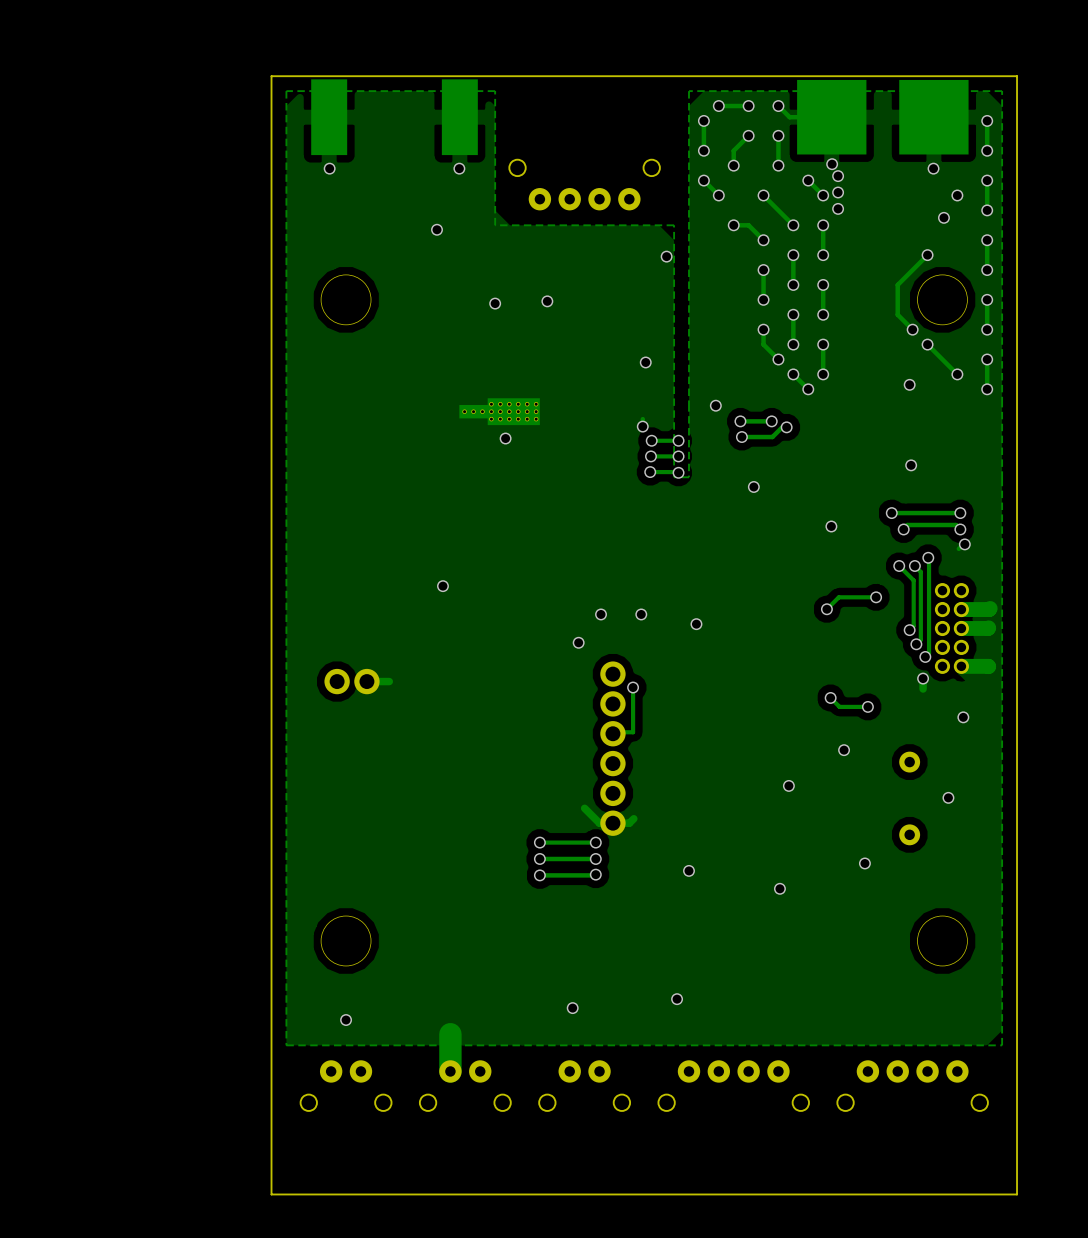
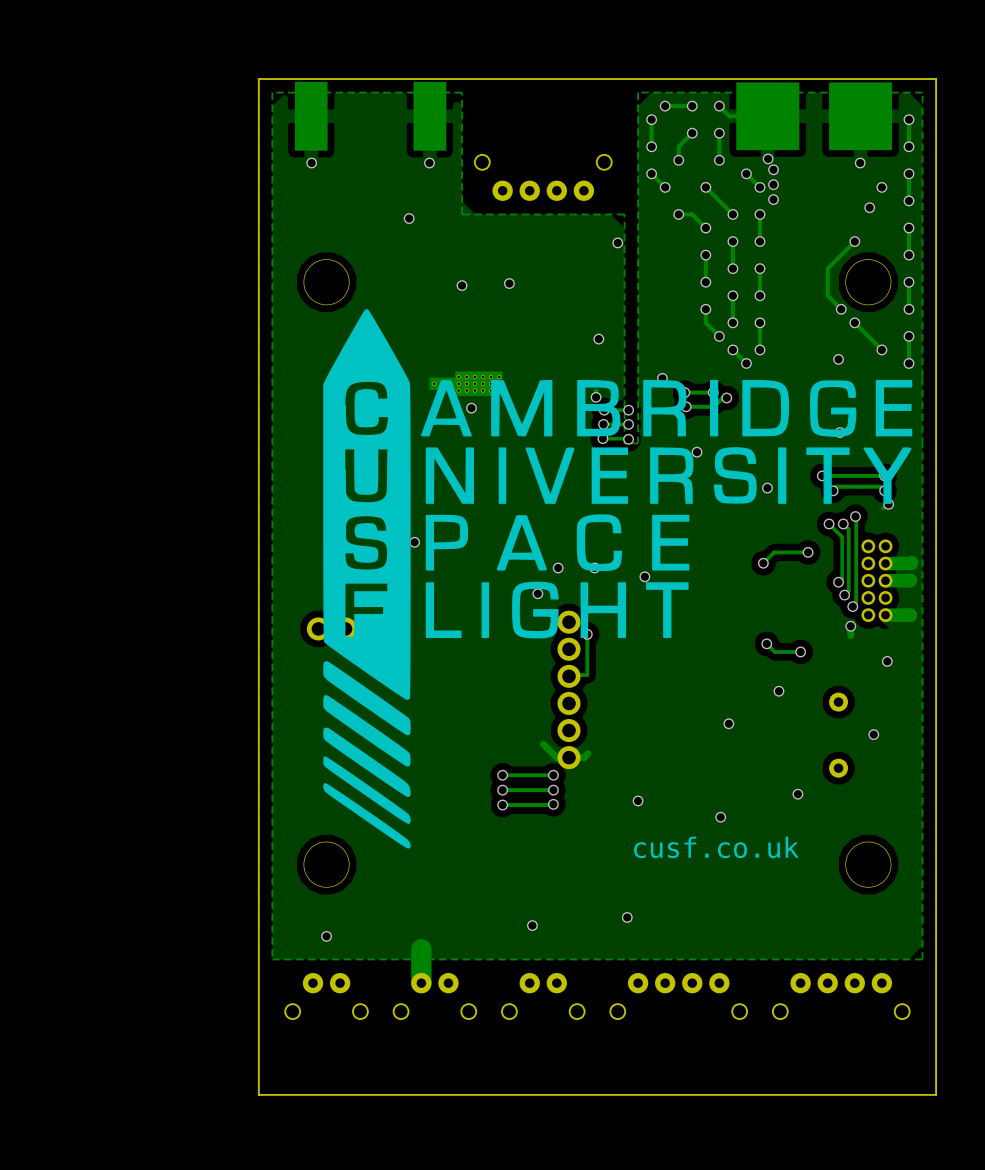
drawing: none -> [323, 309, 913, 849]
text: none -> cusf.co.uk (716, 847)

